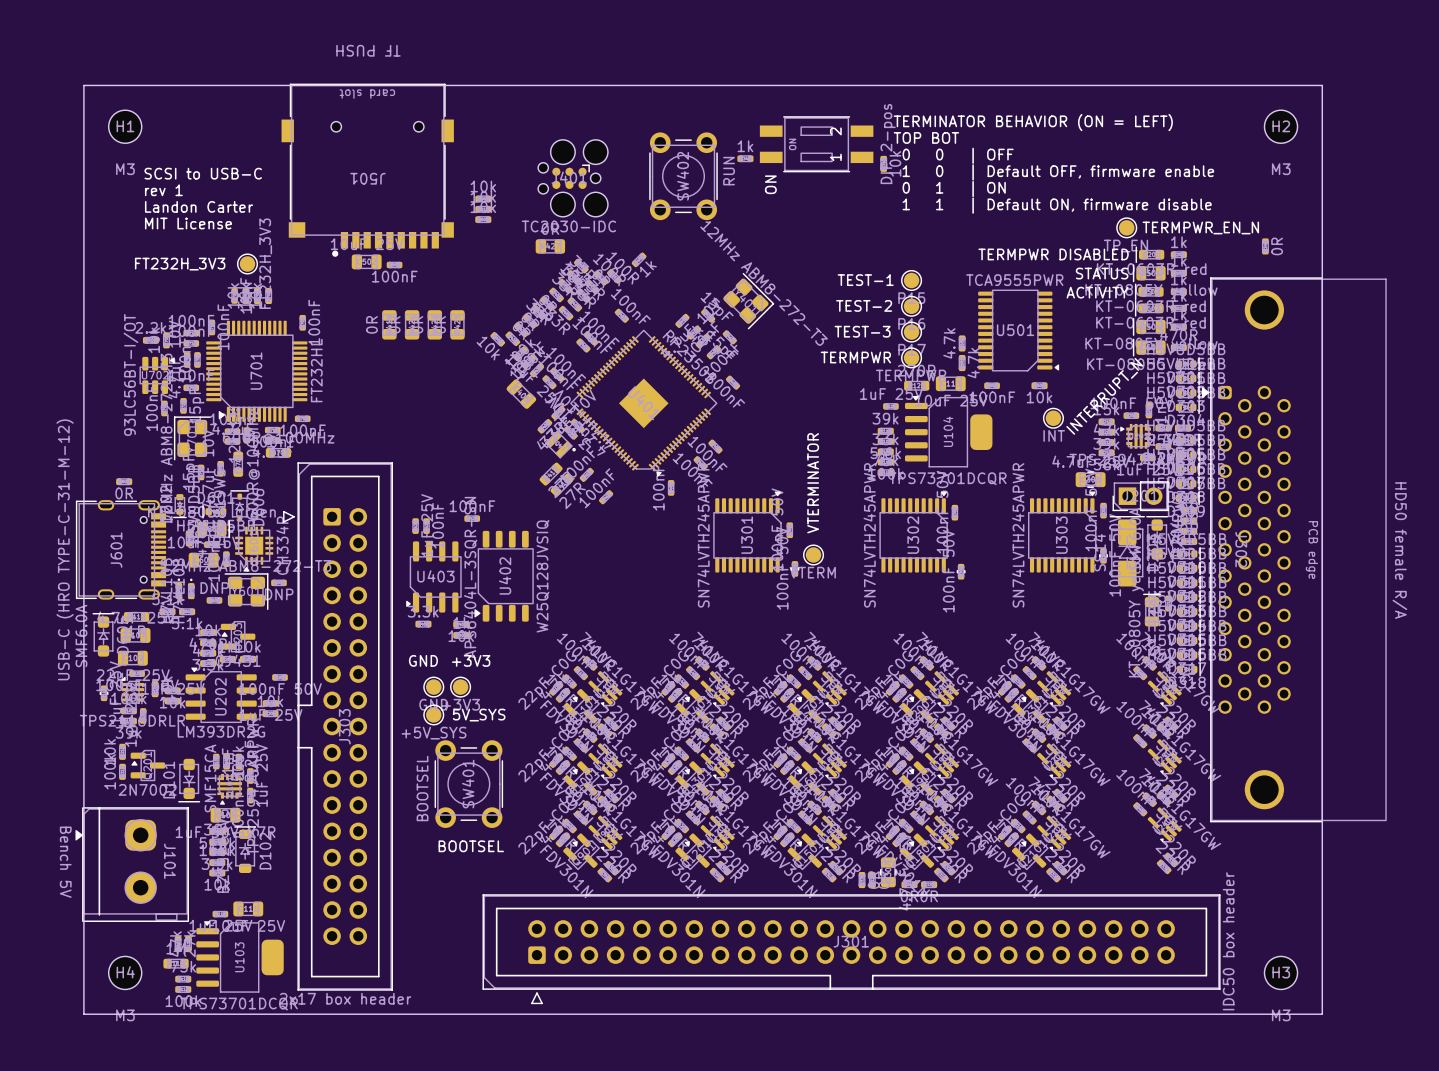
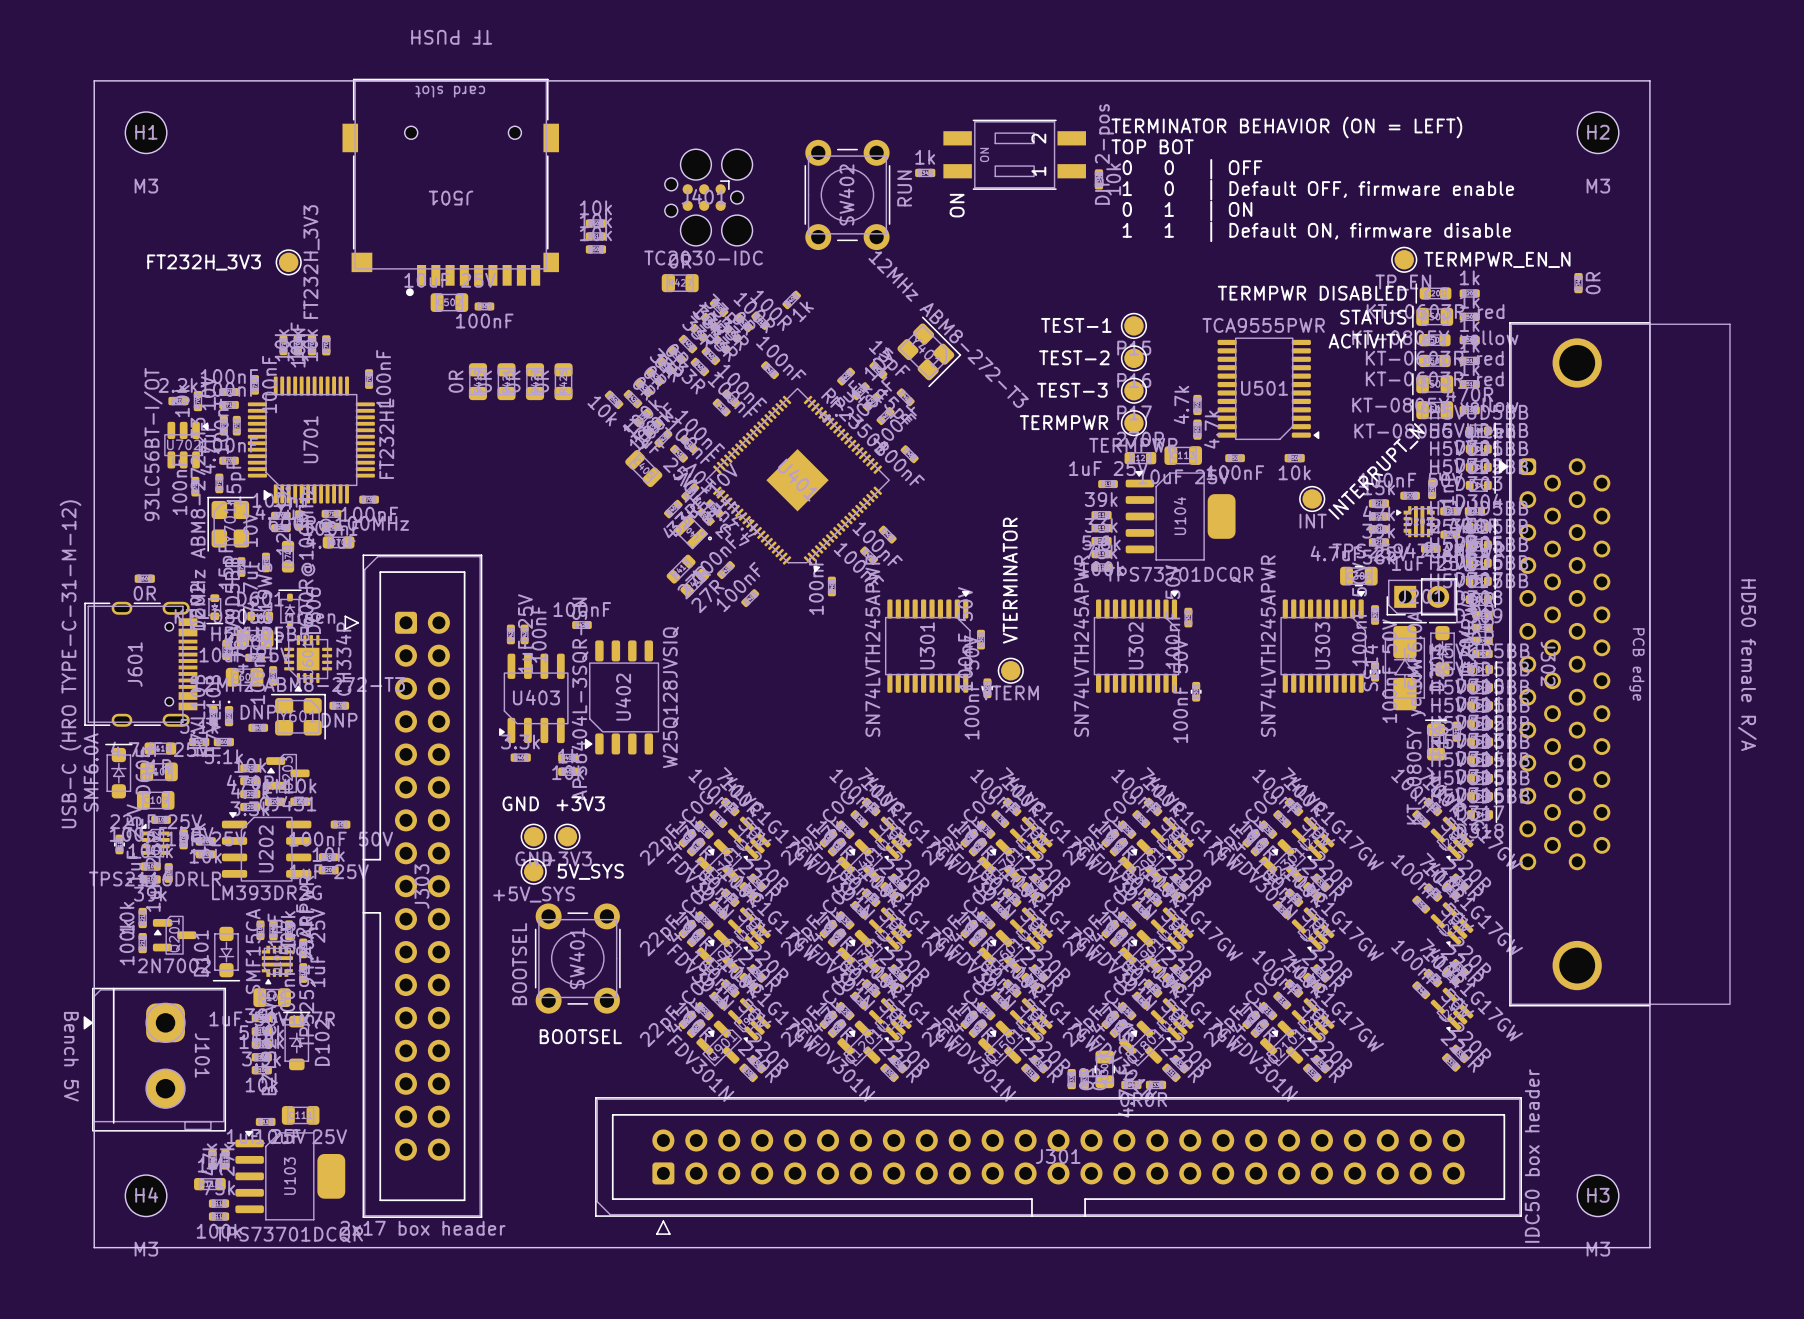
text: SCSI to USB-C (203, 173) -> none
text: rev 1 (163, 190) -> none
text: Landon Carter (199, 206) -> none
text: MIT License (188, 223) -> none
FT232H_3V3 position: (247, 263) -> (288, 262)

